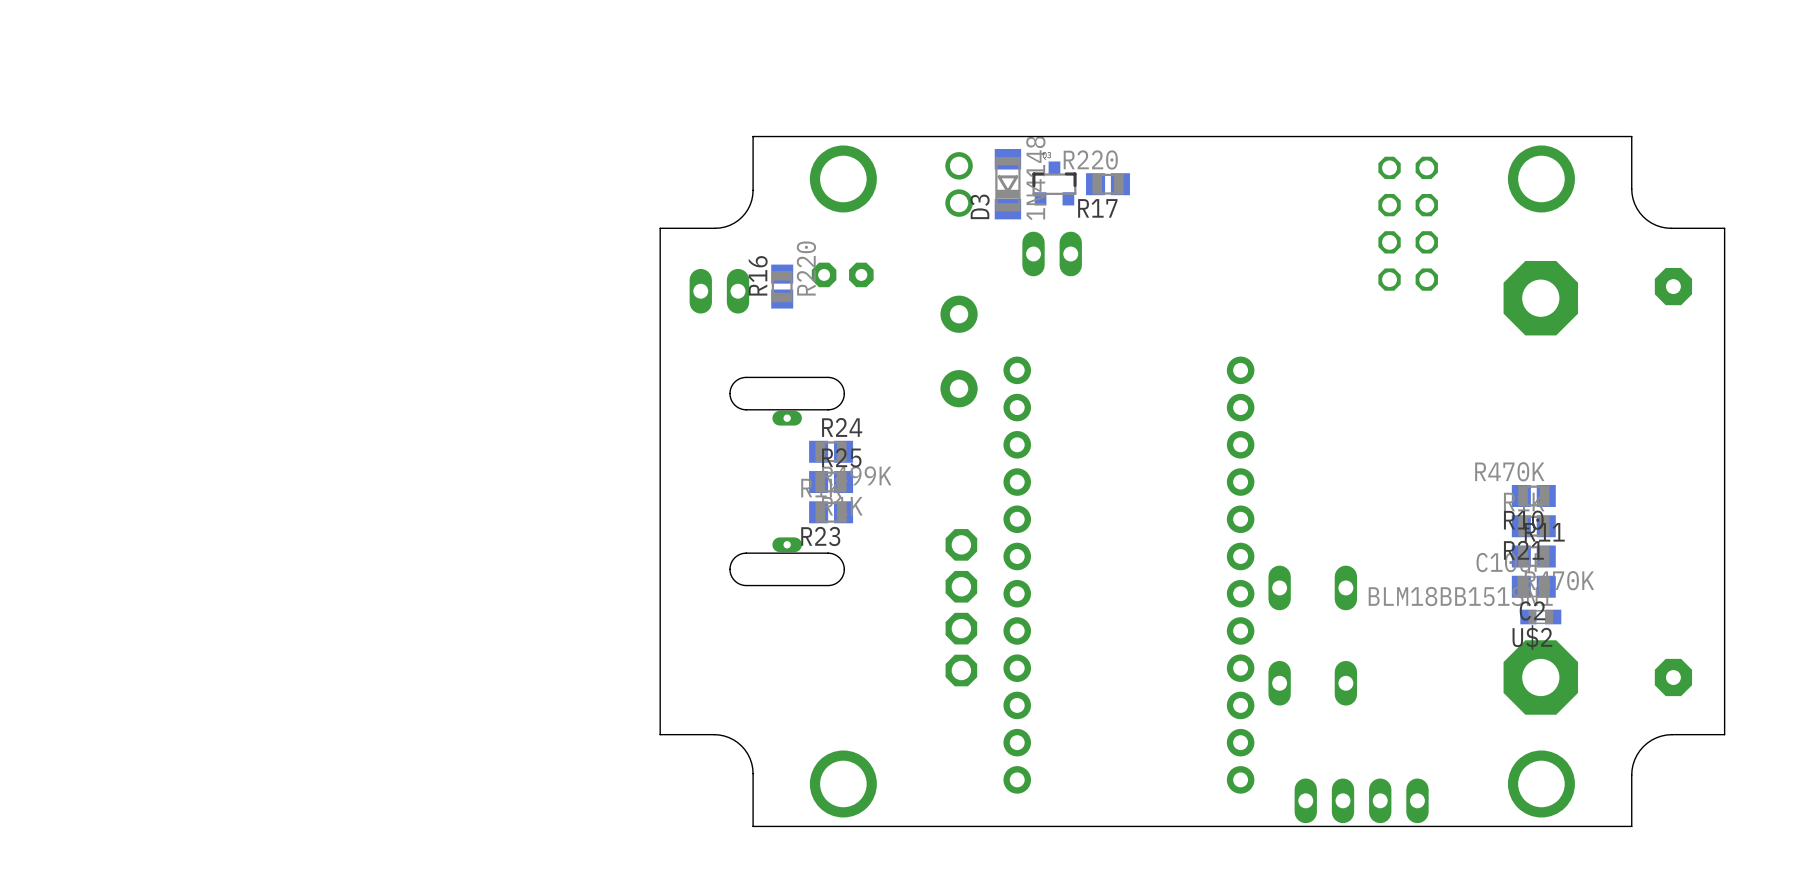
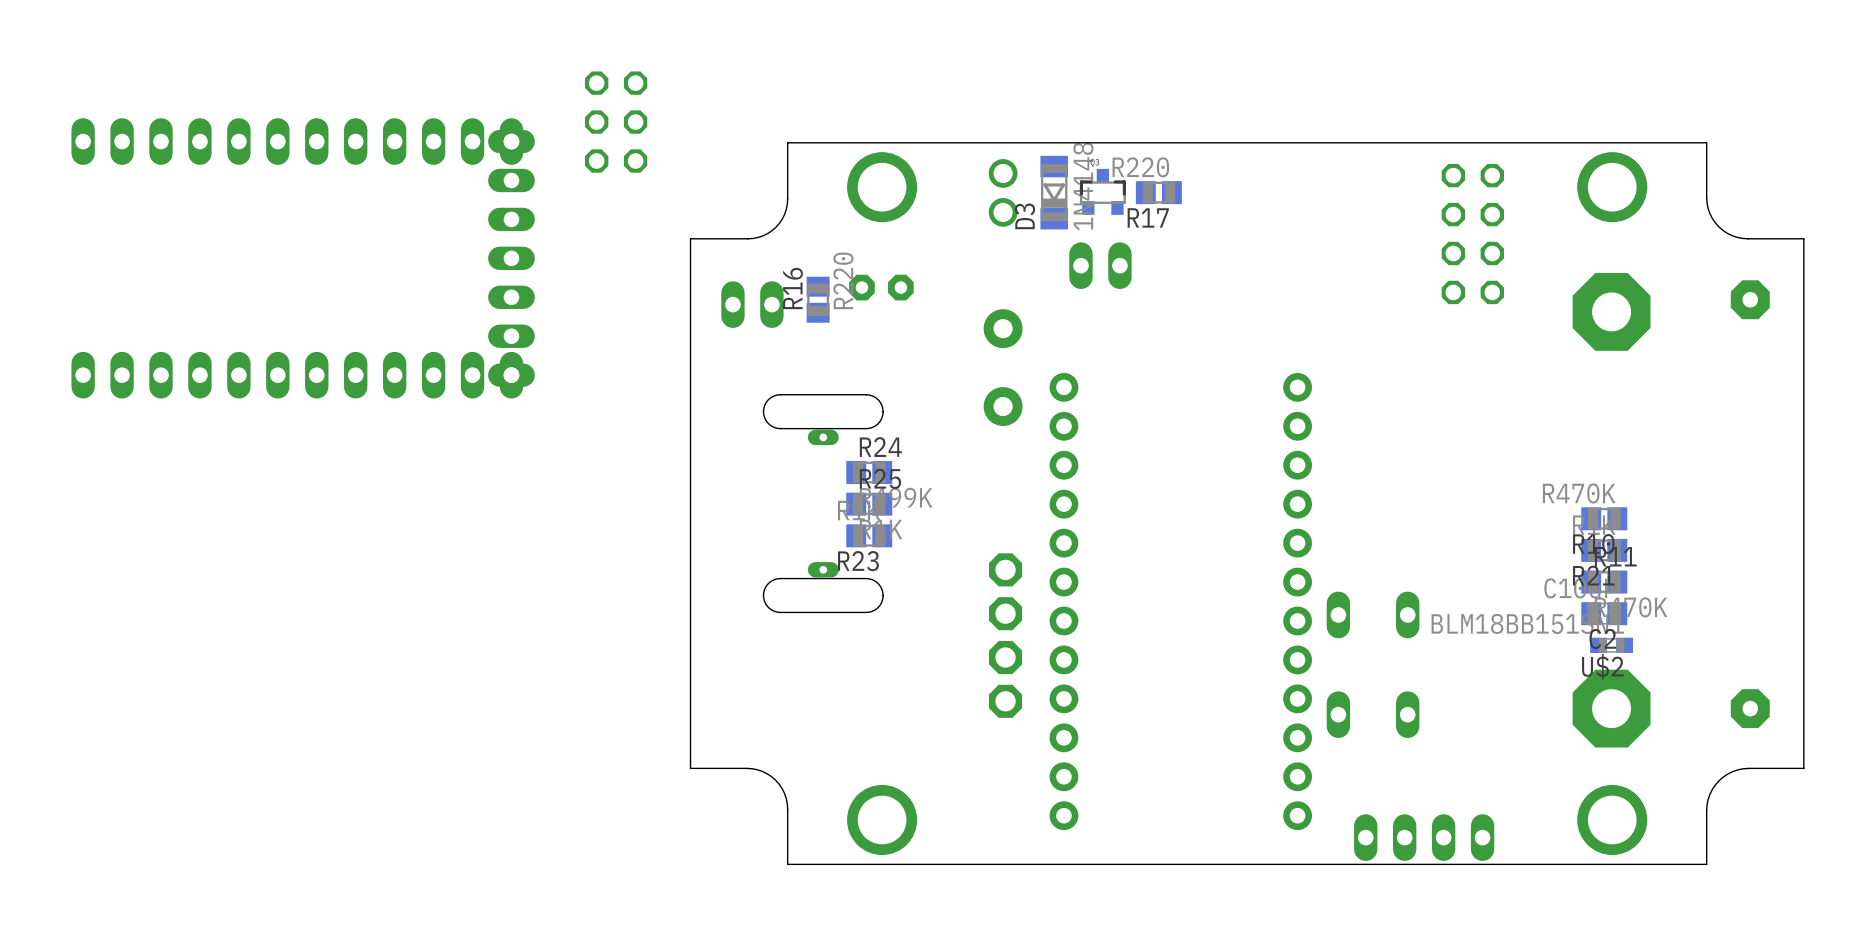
part: none -> (616, 122)
part: none -> (297, 141)
part: none -> (511, 258)
part: none -> (297, 375)

